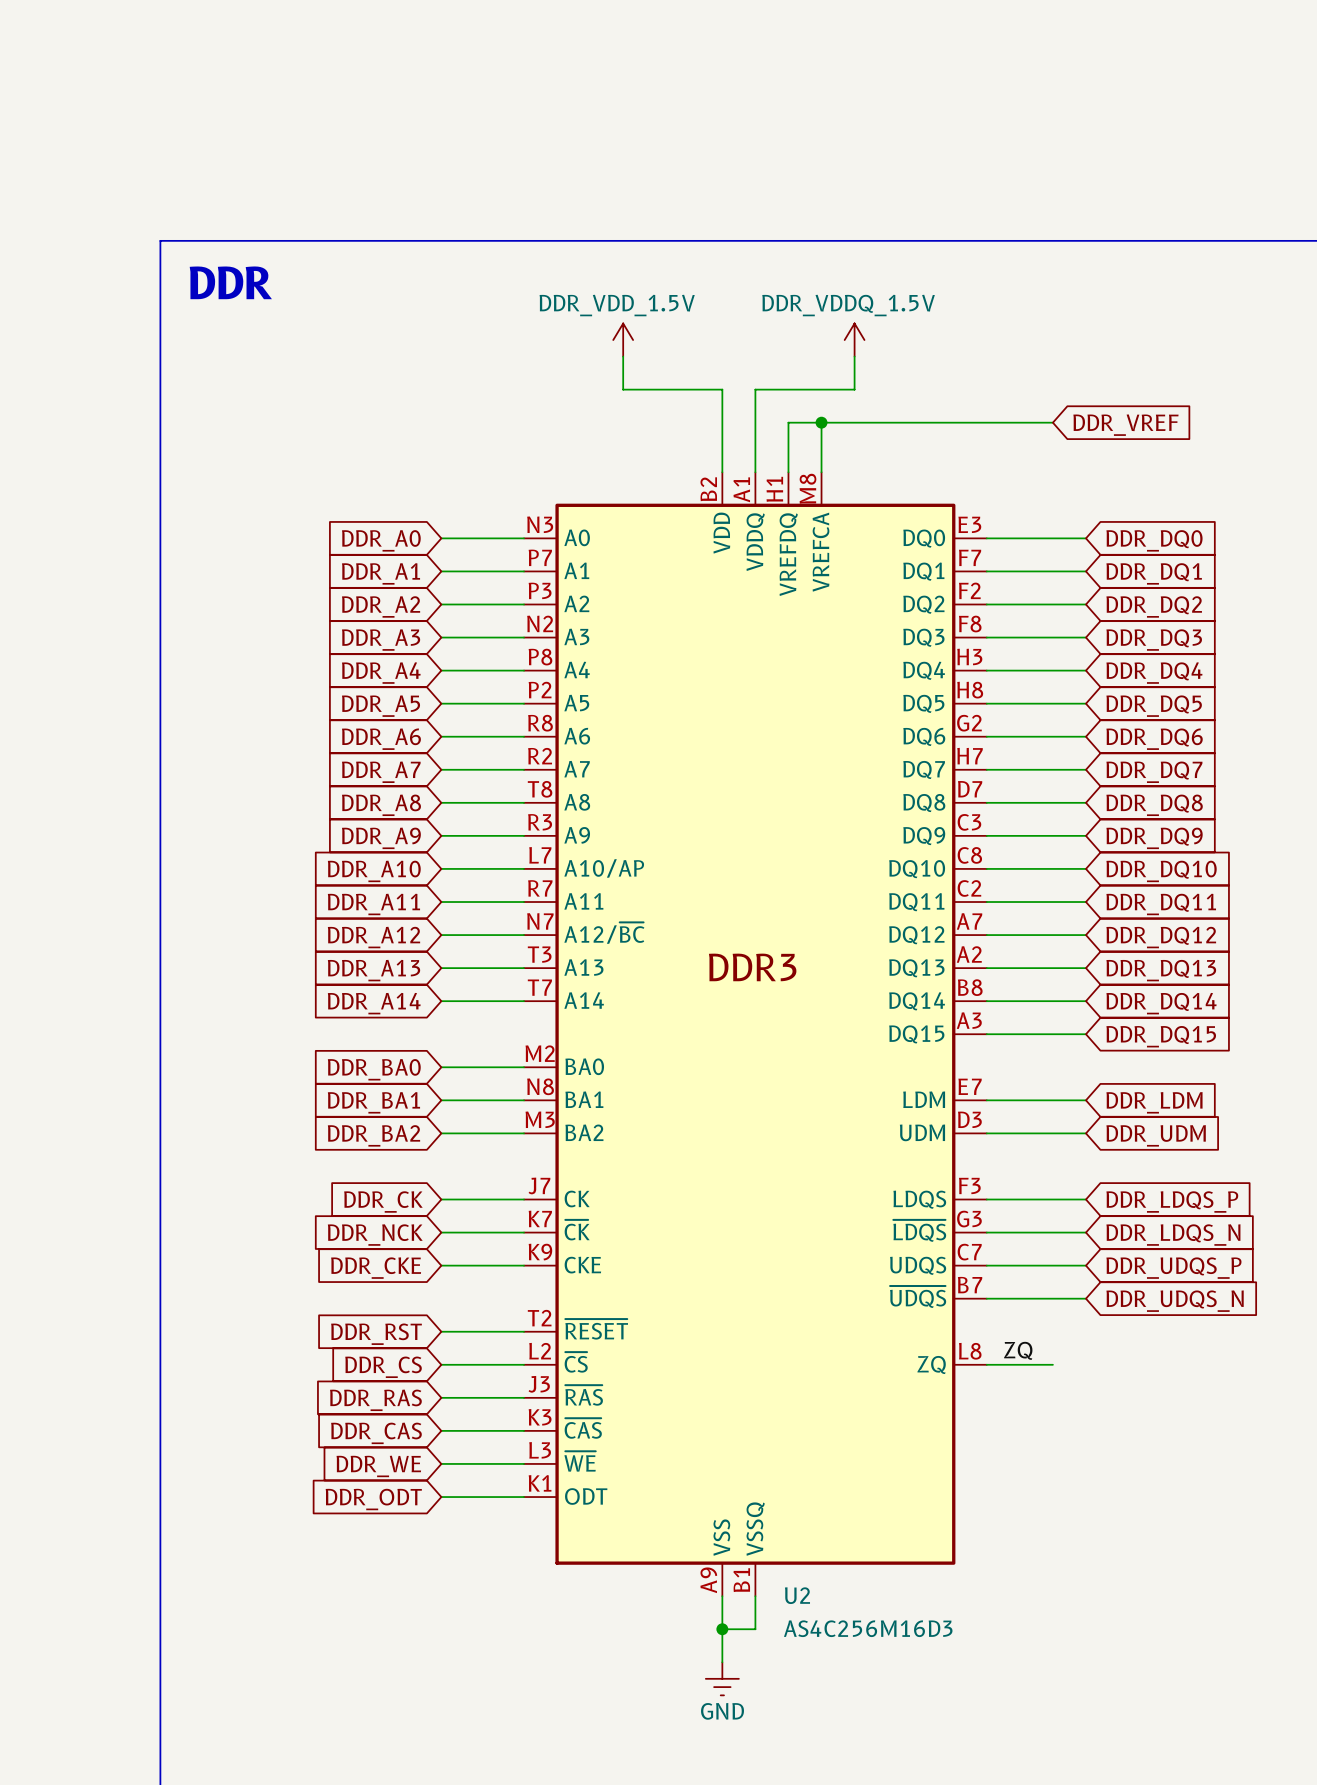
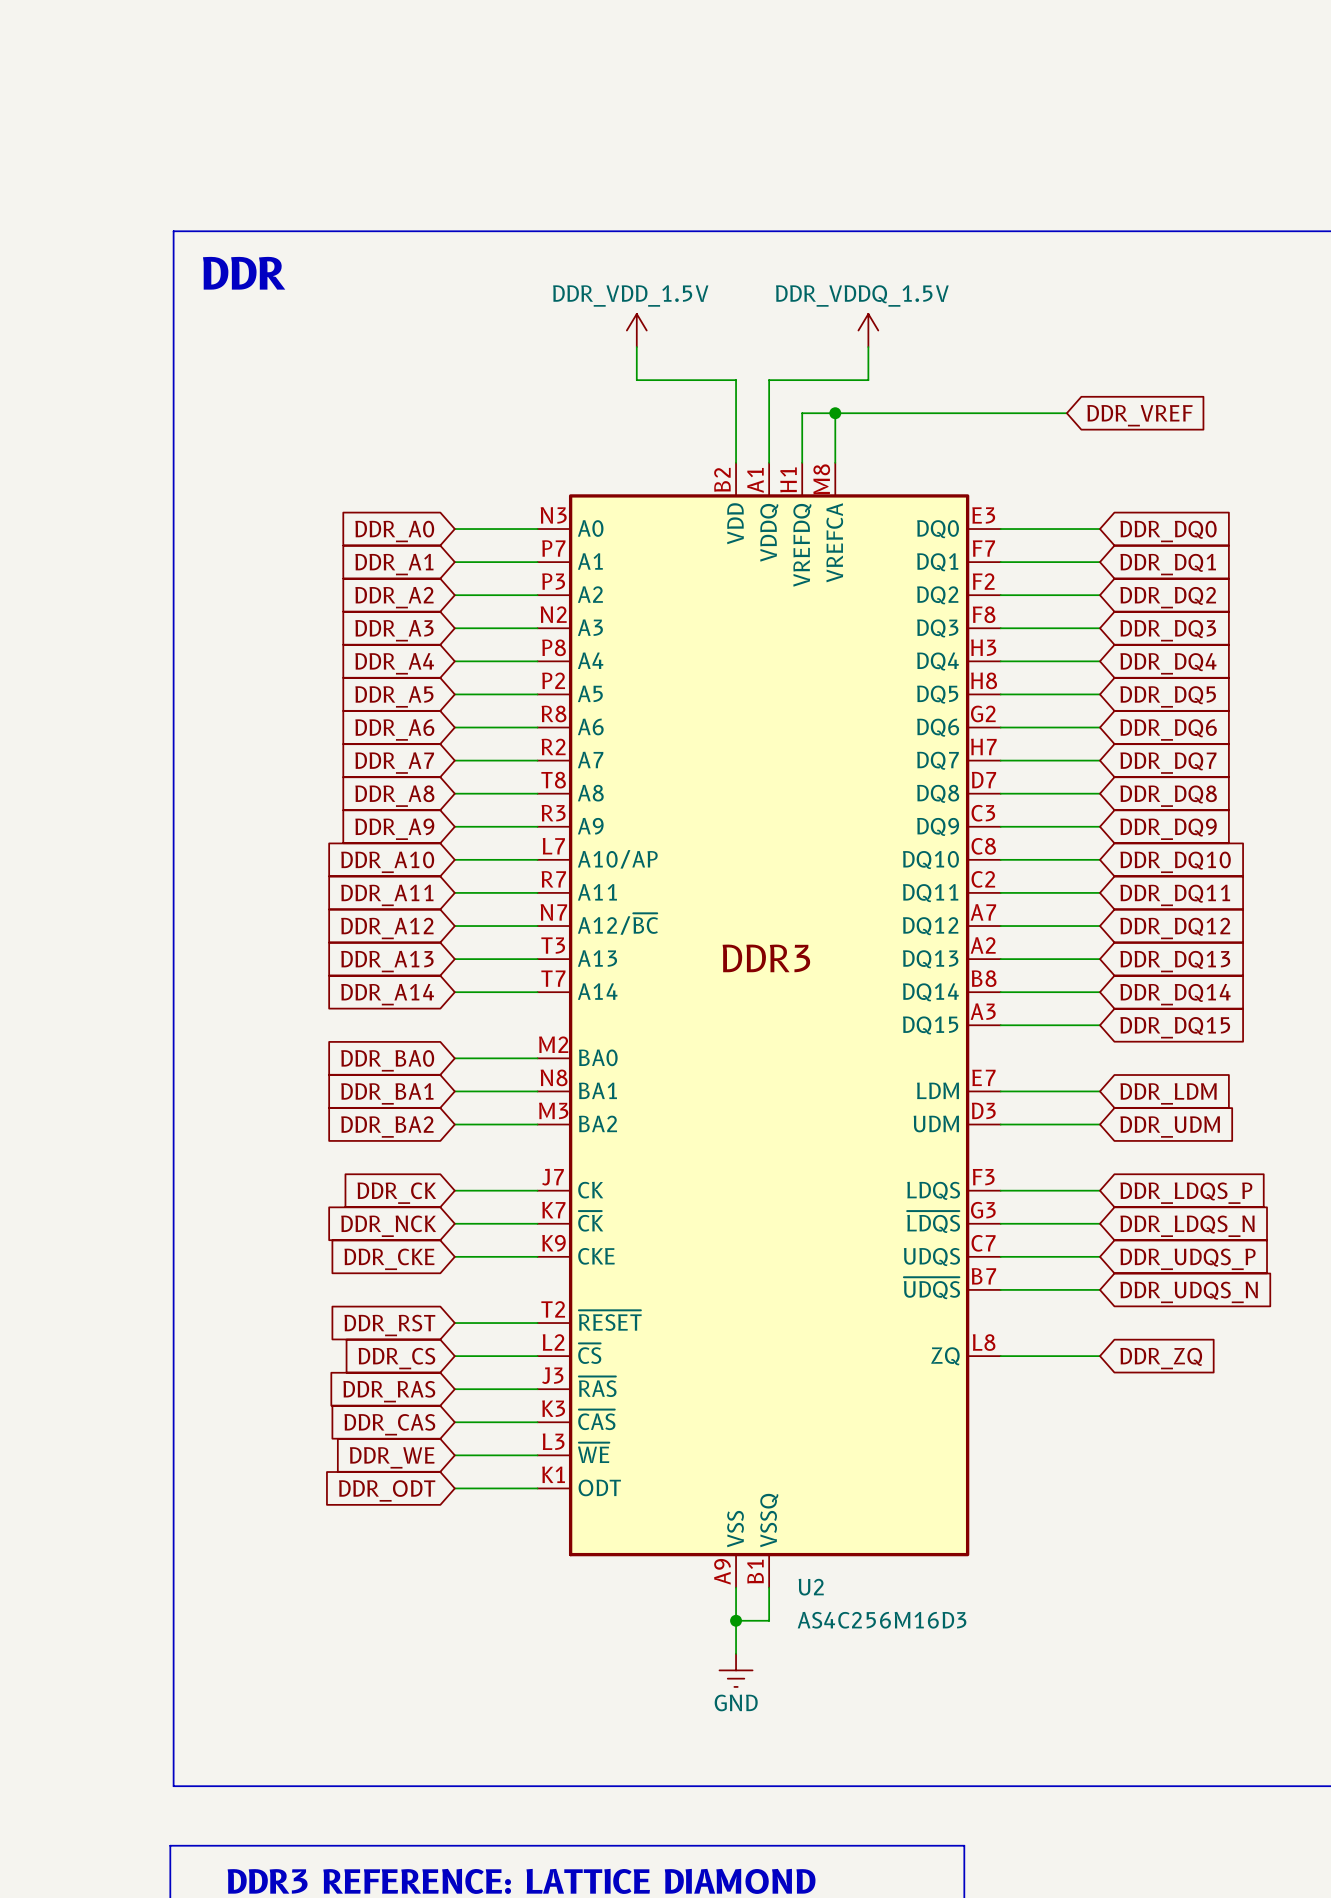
label: ZQ (1018, 1350) -> none
wire: none -> (1066, 1356) (1099, 1356)
global label: none -> DDR_ZQ (1161, 1358)

